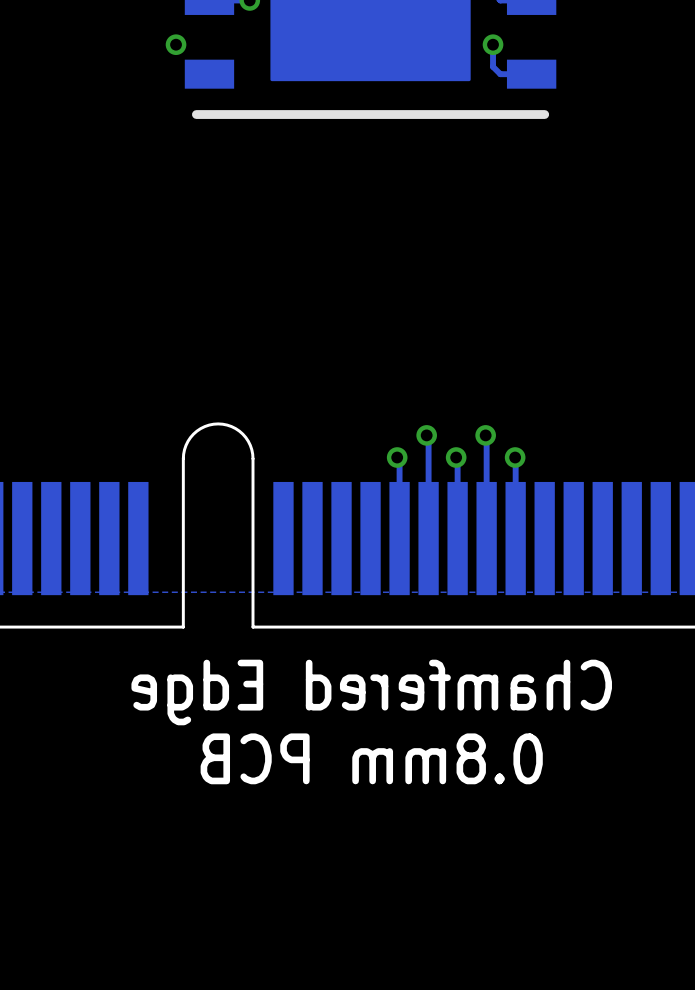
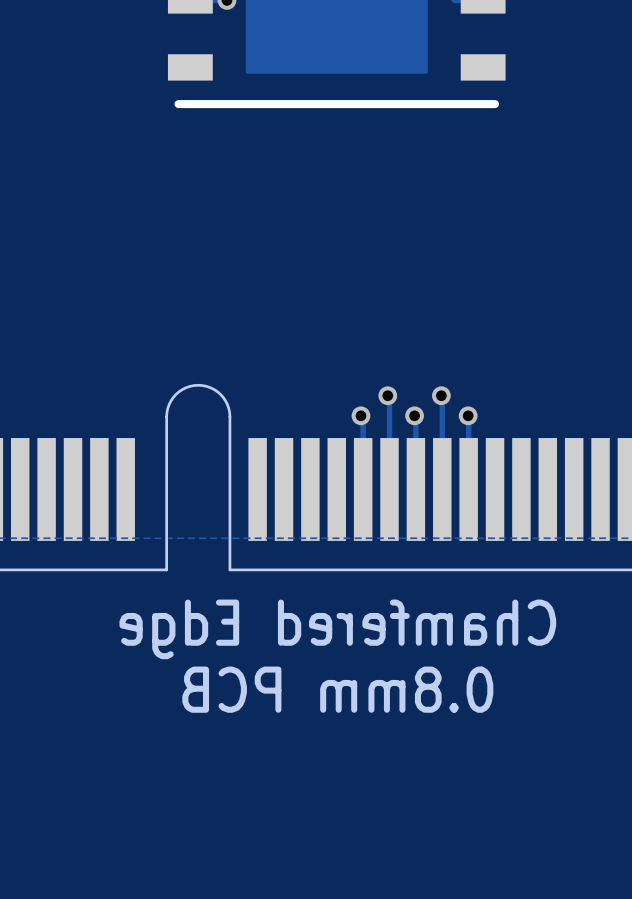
via: (176, 44) -> none
track: (493, 44) (493, 66) (500, 74) (531, 74) -> none
via: (493, 44) -> none

